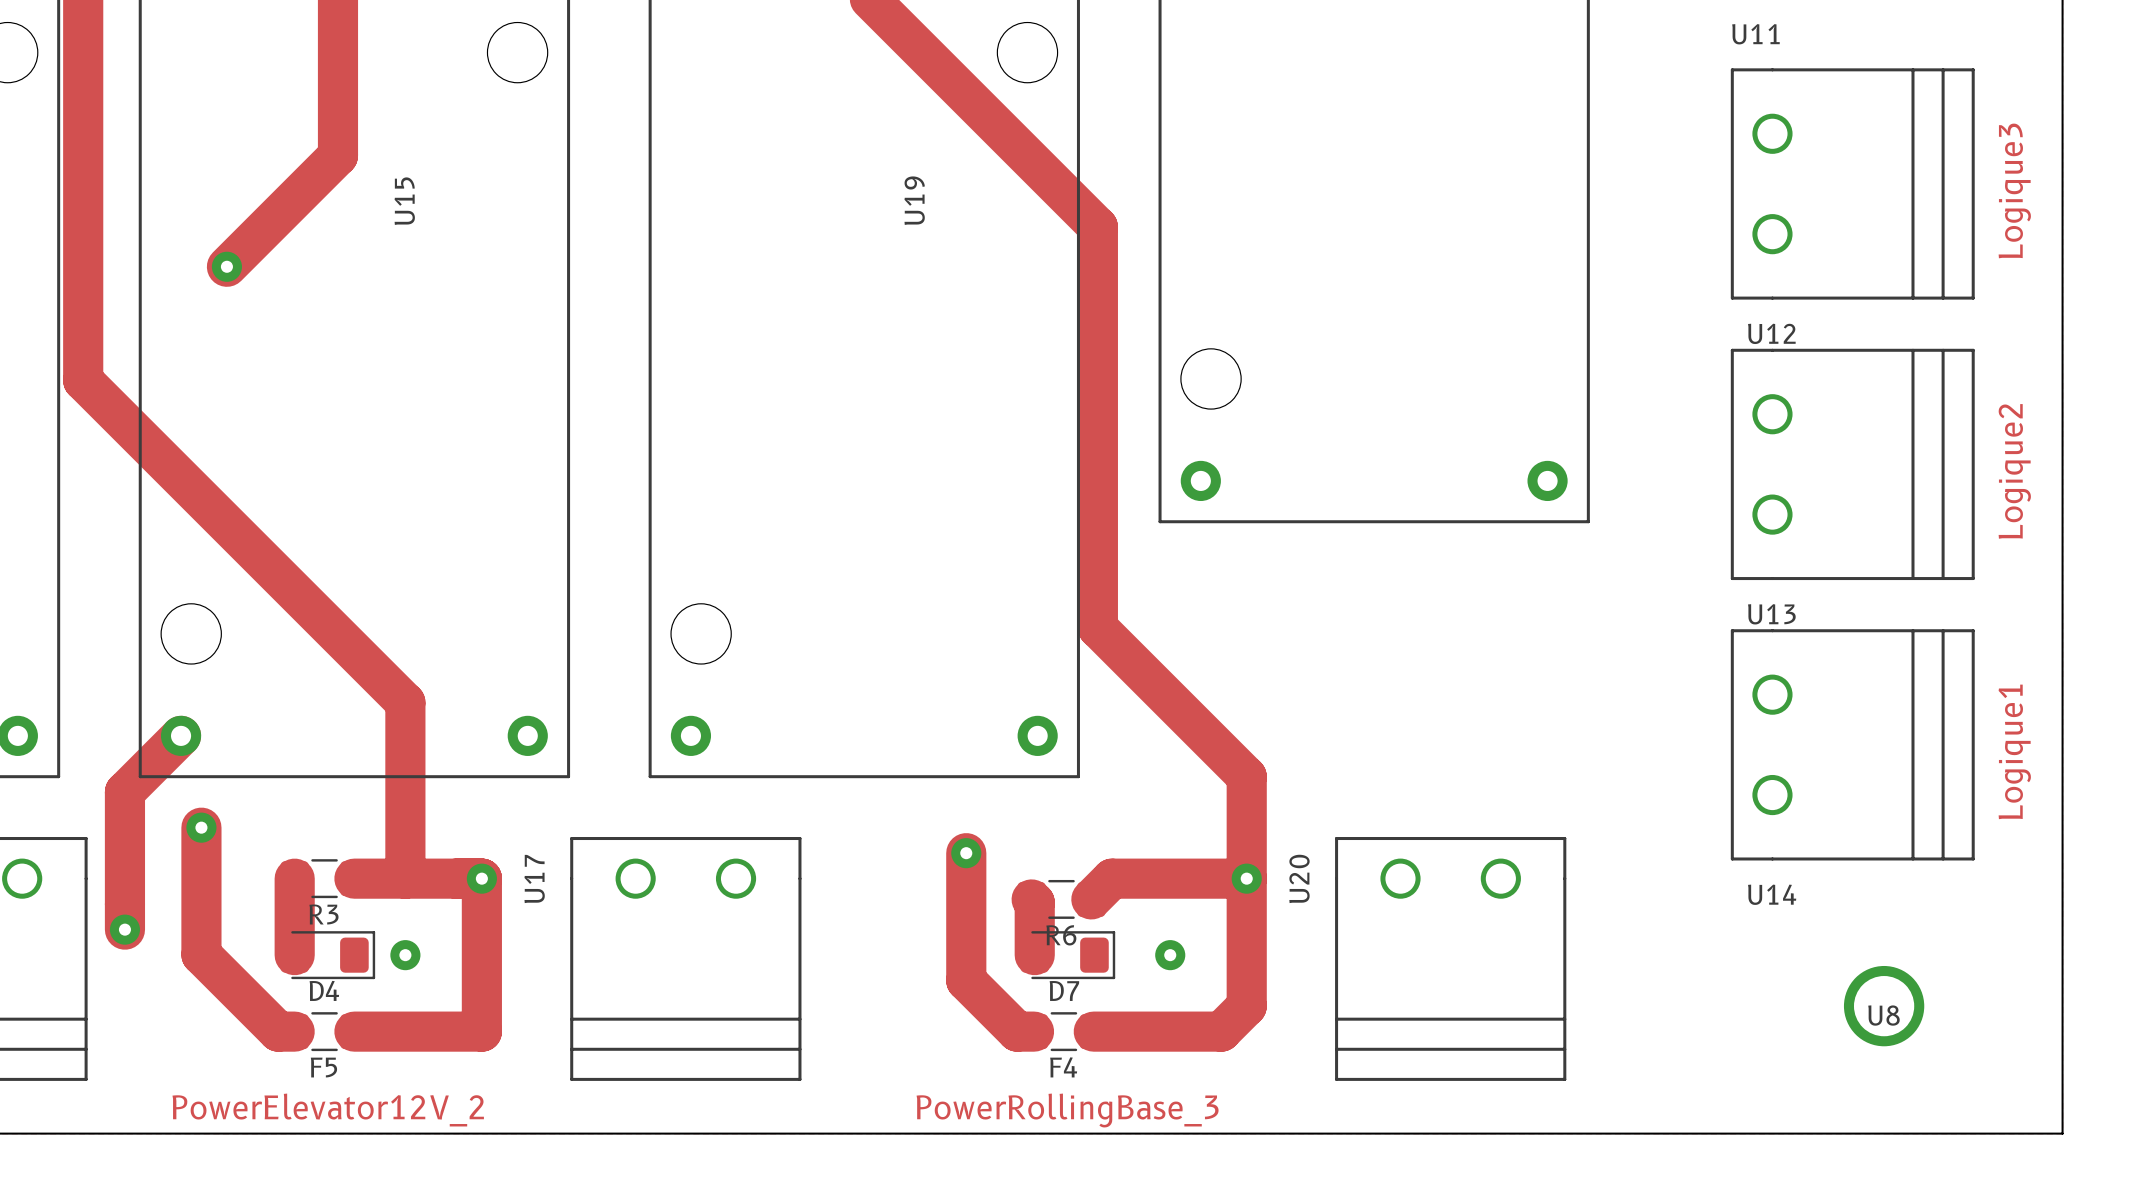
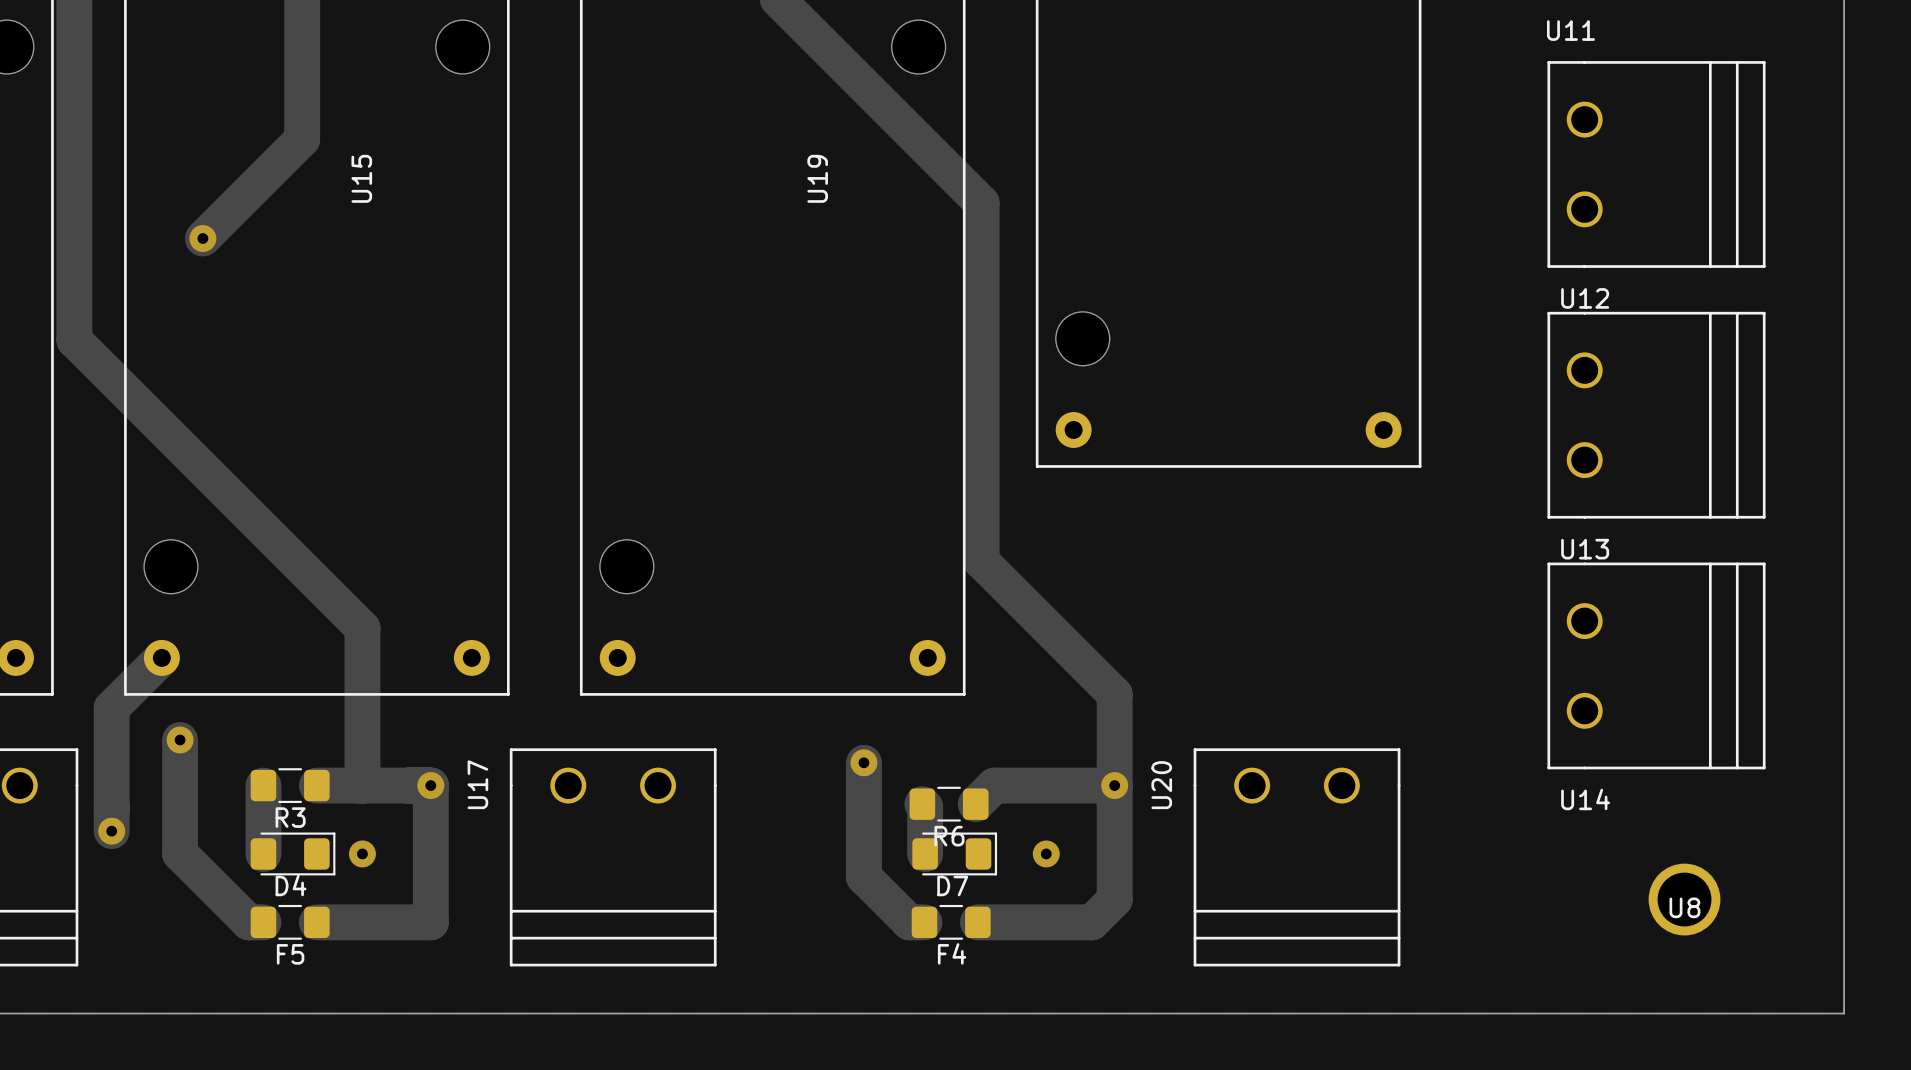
text: Logique3 (2014, 190) -> none
text: Logique2 (2014, 471) -> none
text: Logique1 (2014, 751) -> none
text: PowerElevator12V_2 (328, 1110) -> none
text: PowerRollingBase_3 (1067, 1110) -> none

